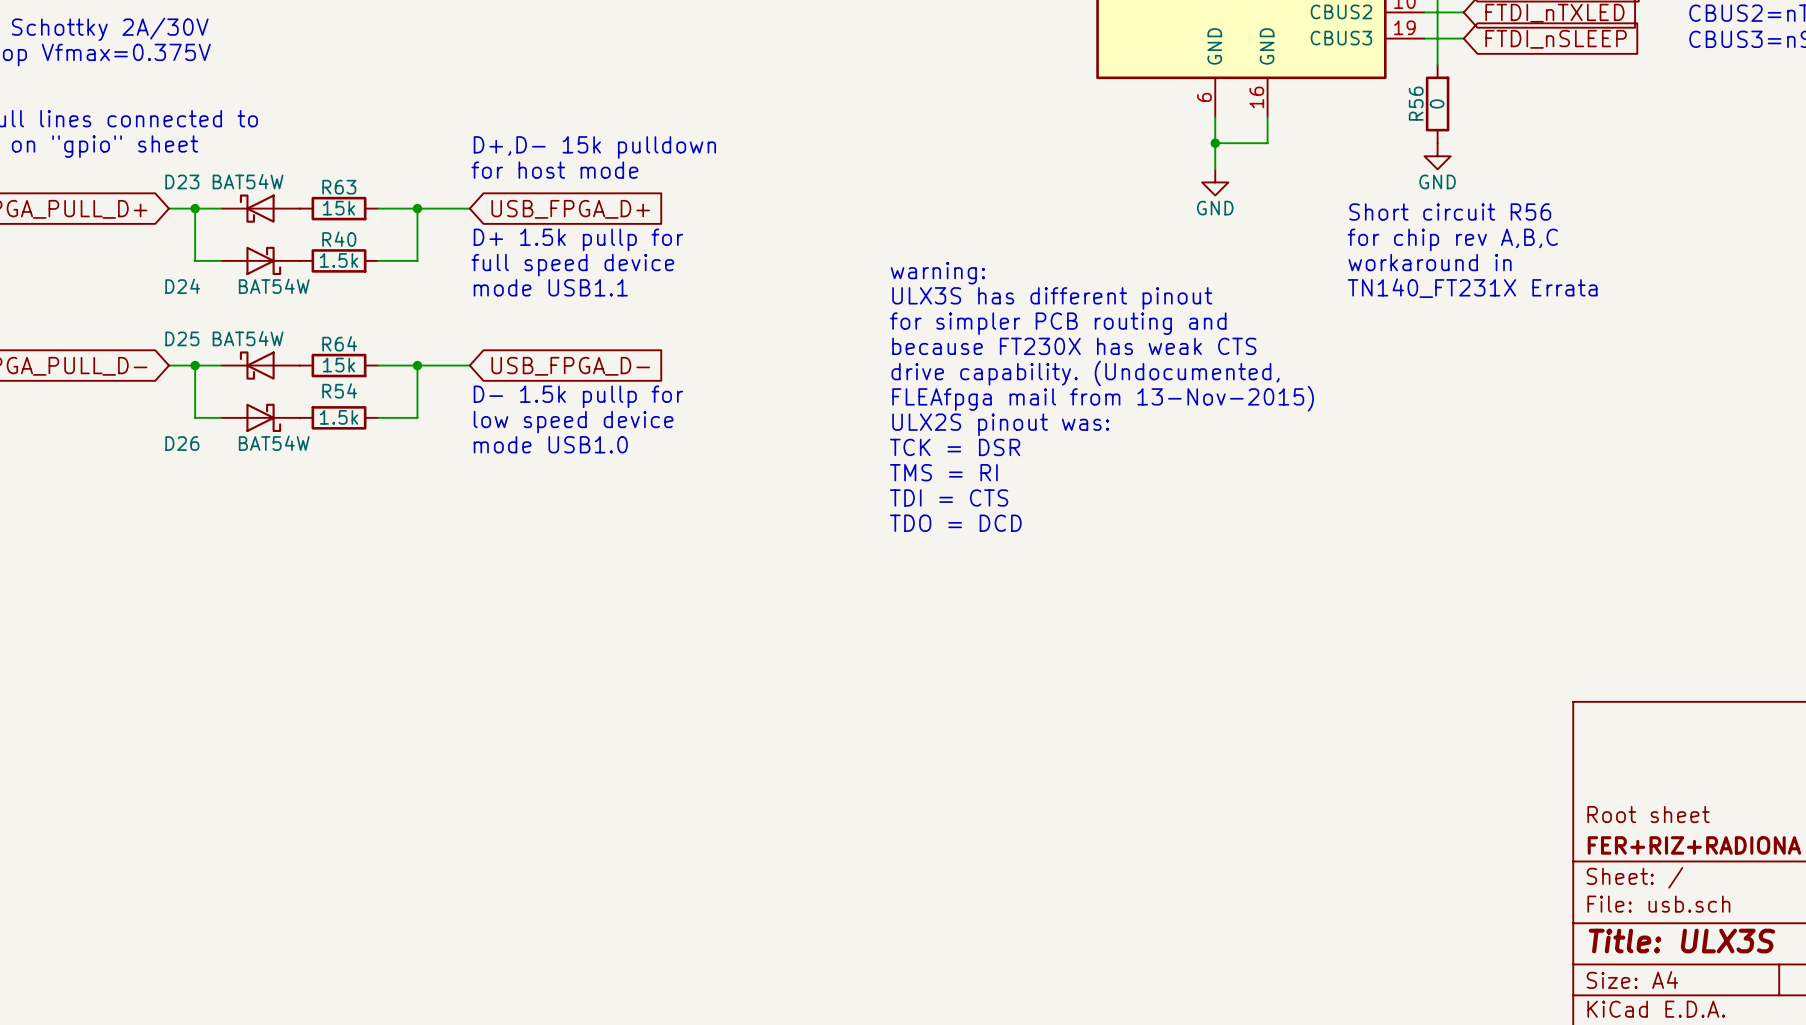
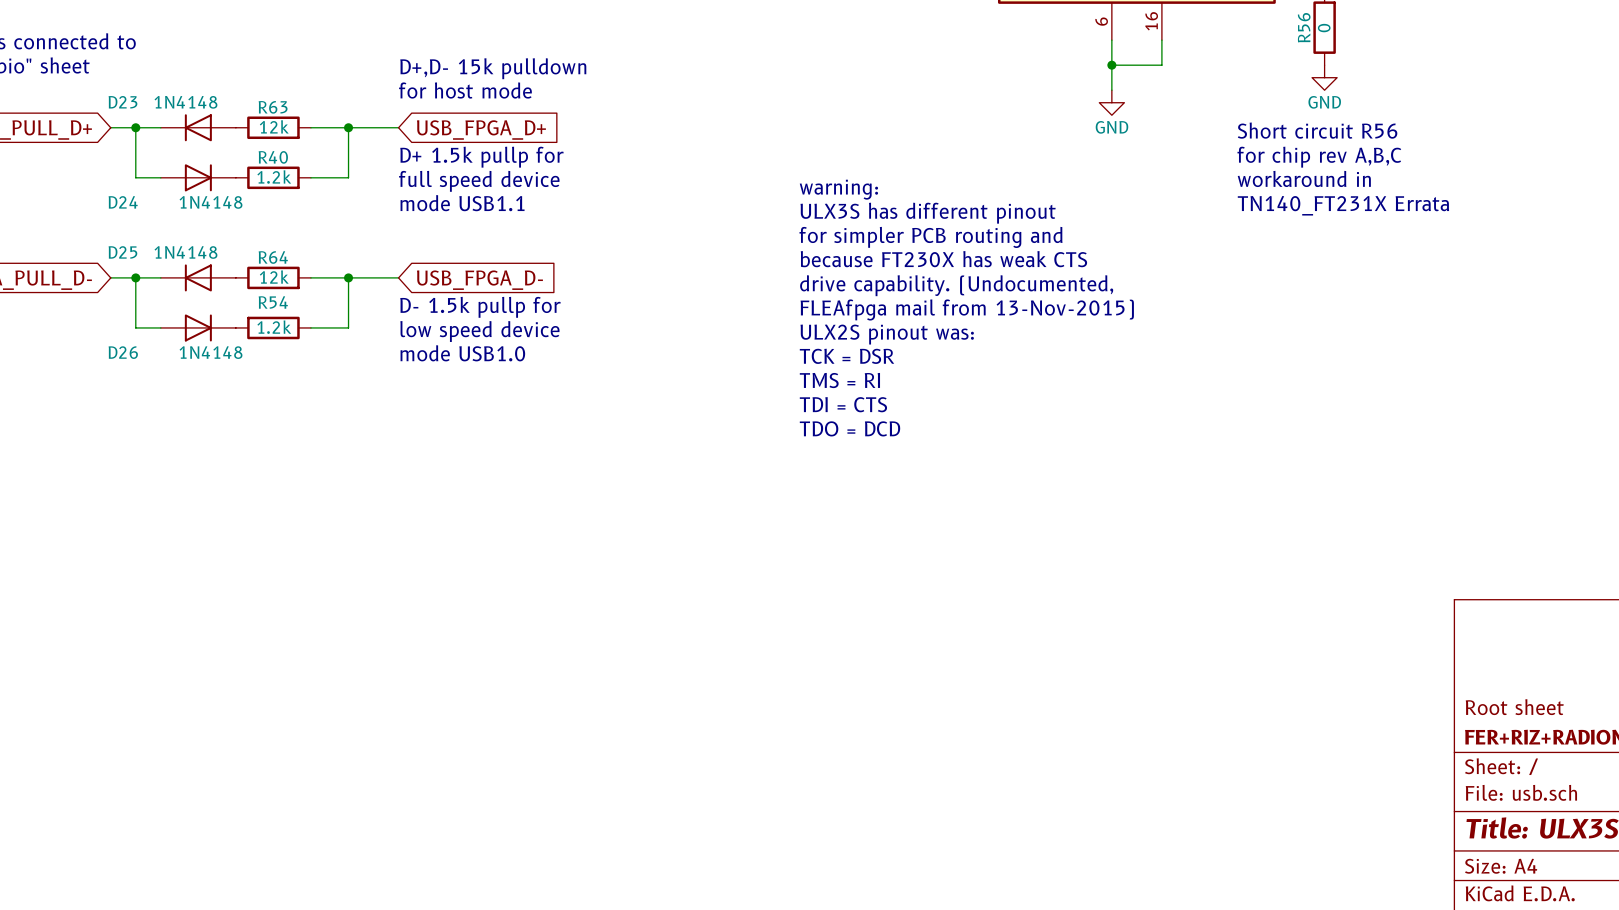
D23 value: BAT54W (248, 181) -> 1N4148 (185, 102)
D23 symbol: [221, 194, 300, 223] -> [160, 114, 236, 142]
R63 value: 15k (339, 208) -> 12k (274, 126)
D24 symbol: [221, 246, 300, 276] -> [160, 164, 236, 192]
R40 value: 1.5k (339, 260) -> 1.2k (274, 177)
D24 value: BAT54W (274, 286) -> 1N4148 (210, 202)
D25 value: BAT54W (248, 338) -> 1N4148 (185, 252)
D25 symbol: [221, 351, 300, 380] -> [160, 264, 236, 292]
R64 value: 15k (339, 365) -> 12k (274, 277)
D26 symbol: [221, 403, 300, 432] -> [160, 314, 236, 342]
R54 value: 1.5k (339, 417) -> 1.2k (274, 327)
D26 value: BAT54W (274, 443) -> 1N4148 (210, 352)

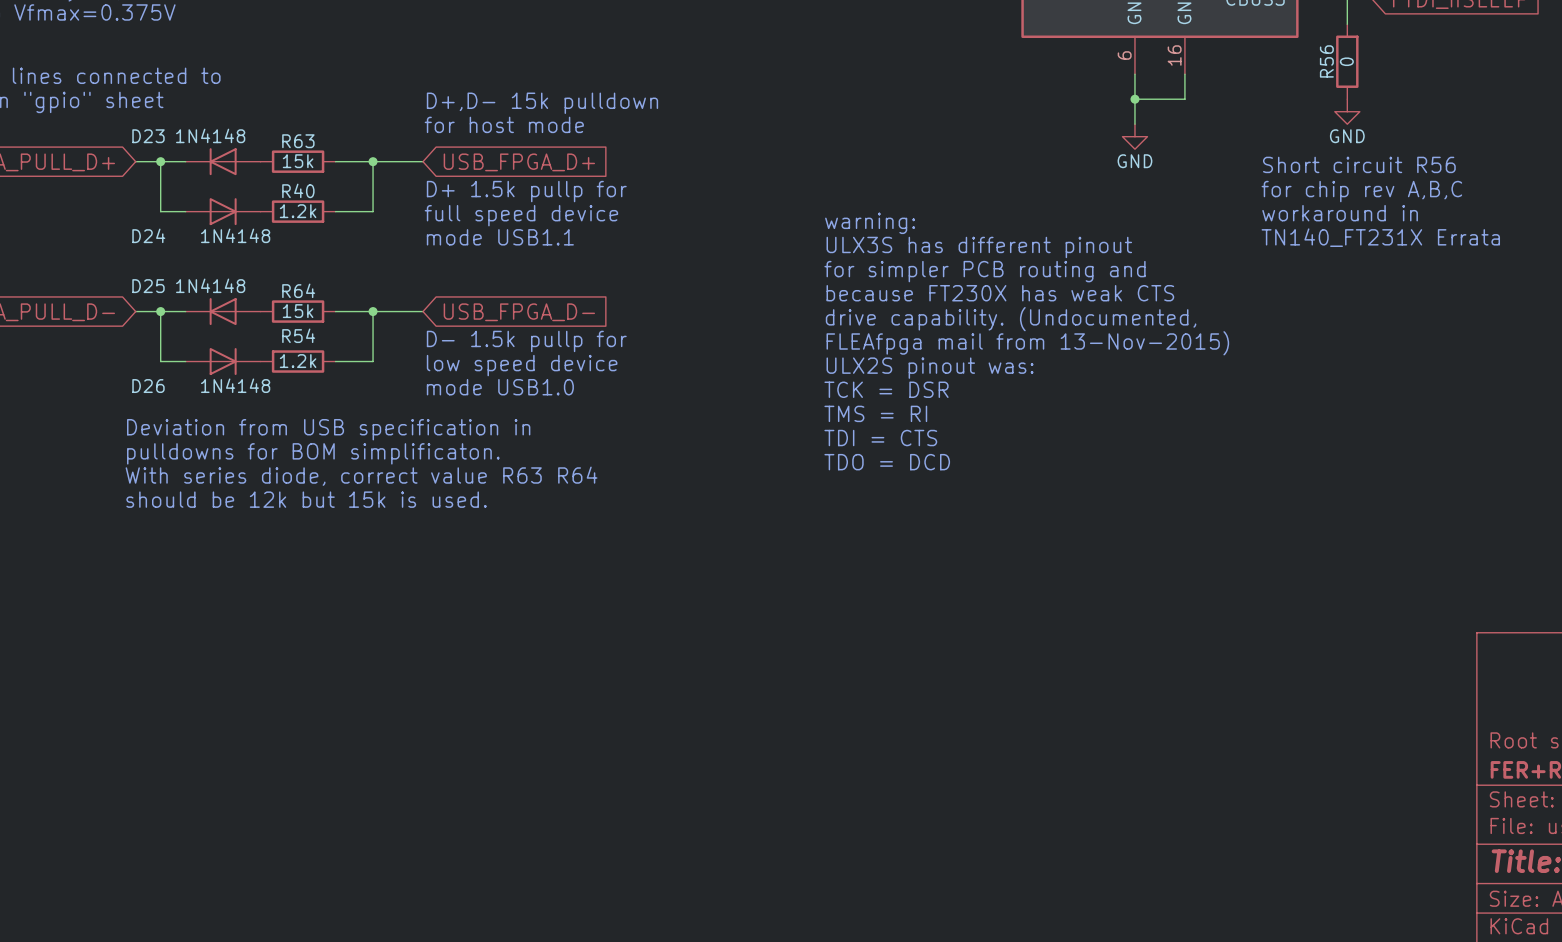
R63 value: 12k (274, 126) -> 15k (298, 161)
R64 value: 12k (274, 277) -> 15k (298, 311)
text: none -> Deviation from USB specification in (328, 429)
text: none -> pulldowns for BOM simplificaton. (313, 453)
text: none -> With series diode, correct value R63 R64 (361, 476)
text: none -> should be 12k but 15k is used. (306, 499)

